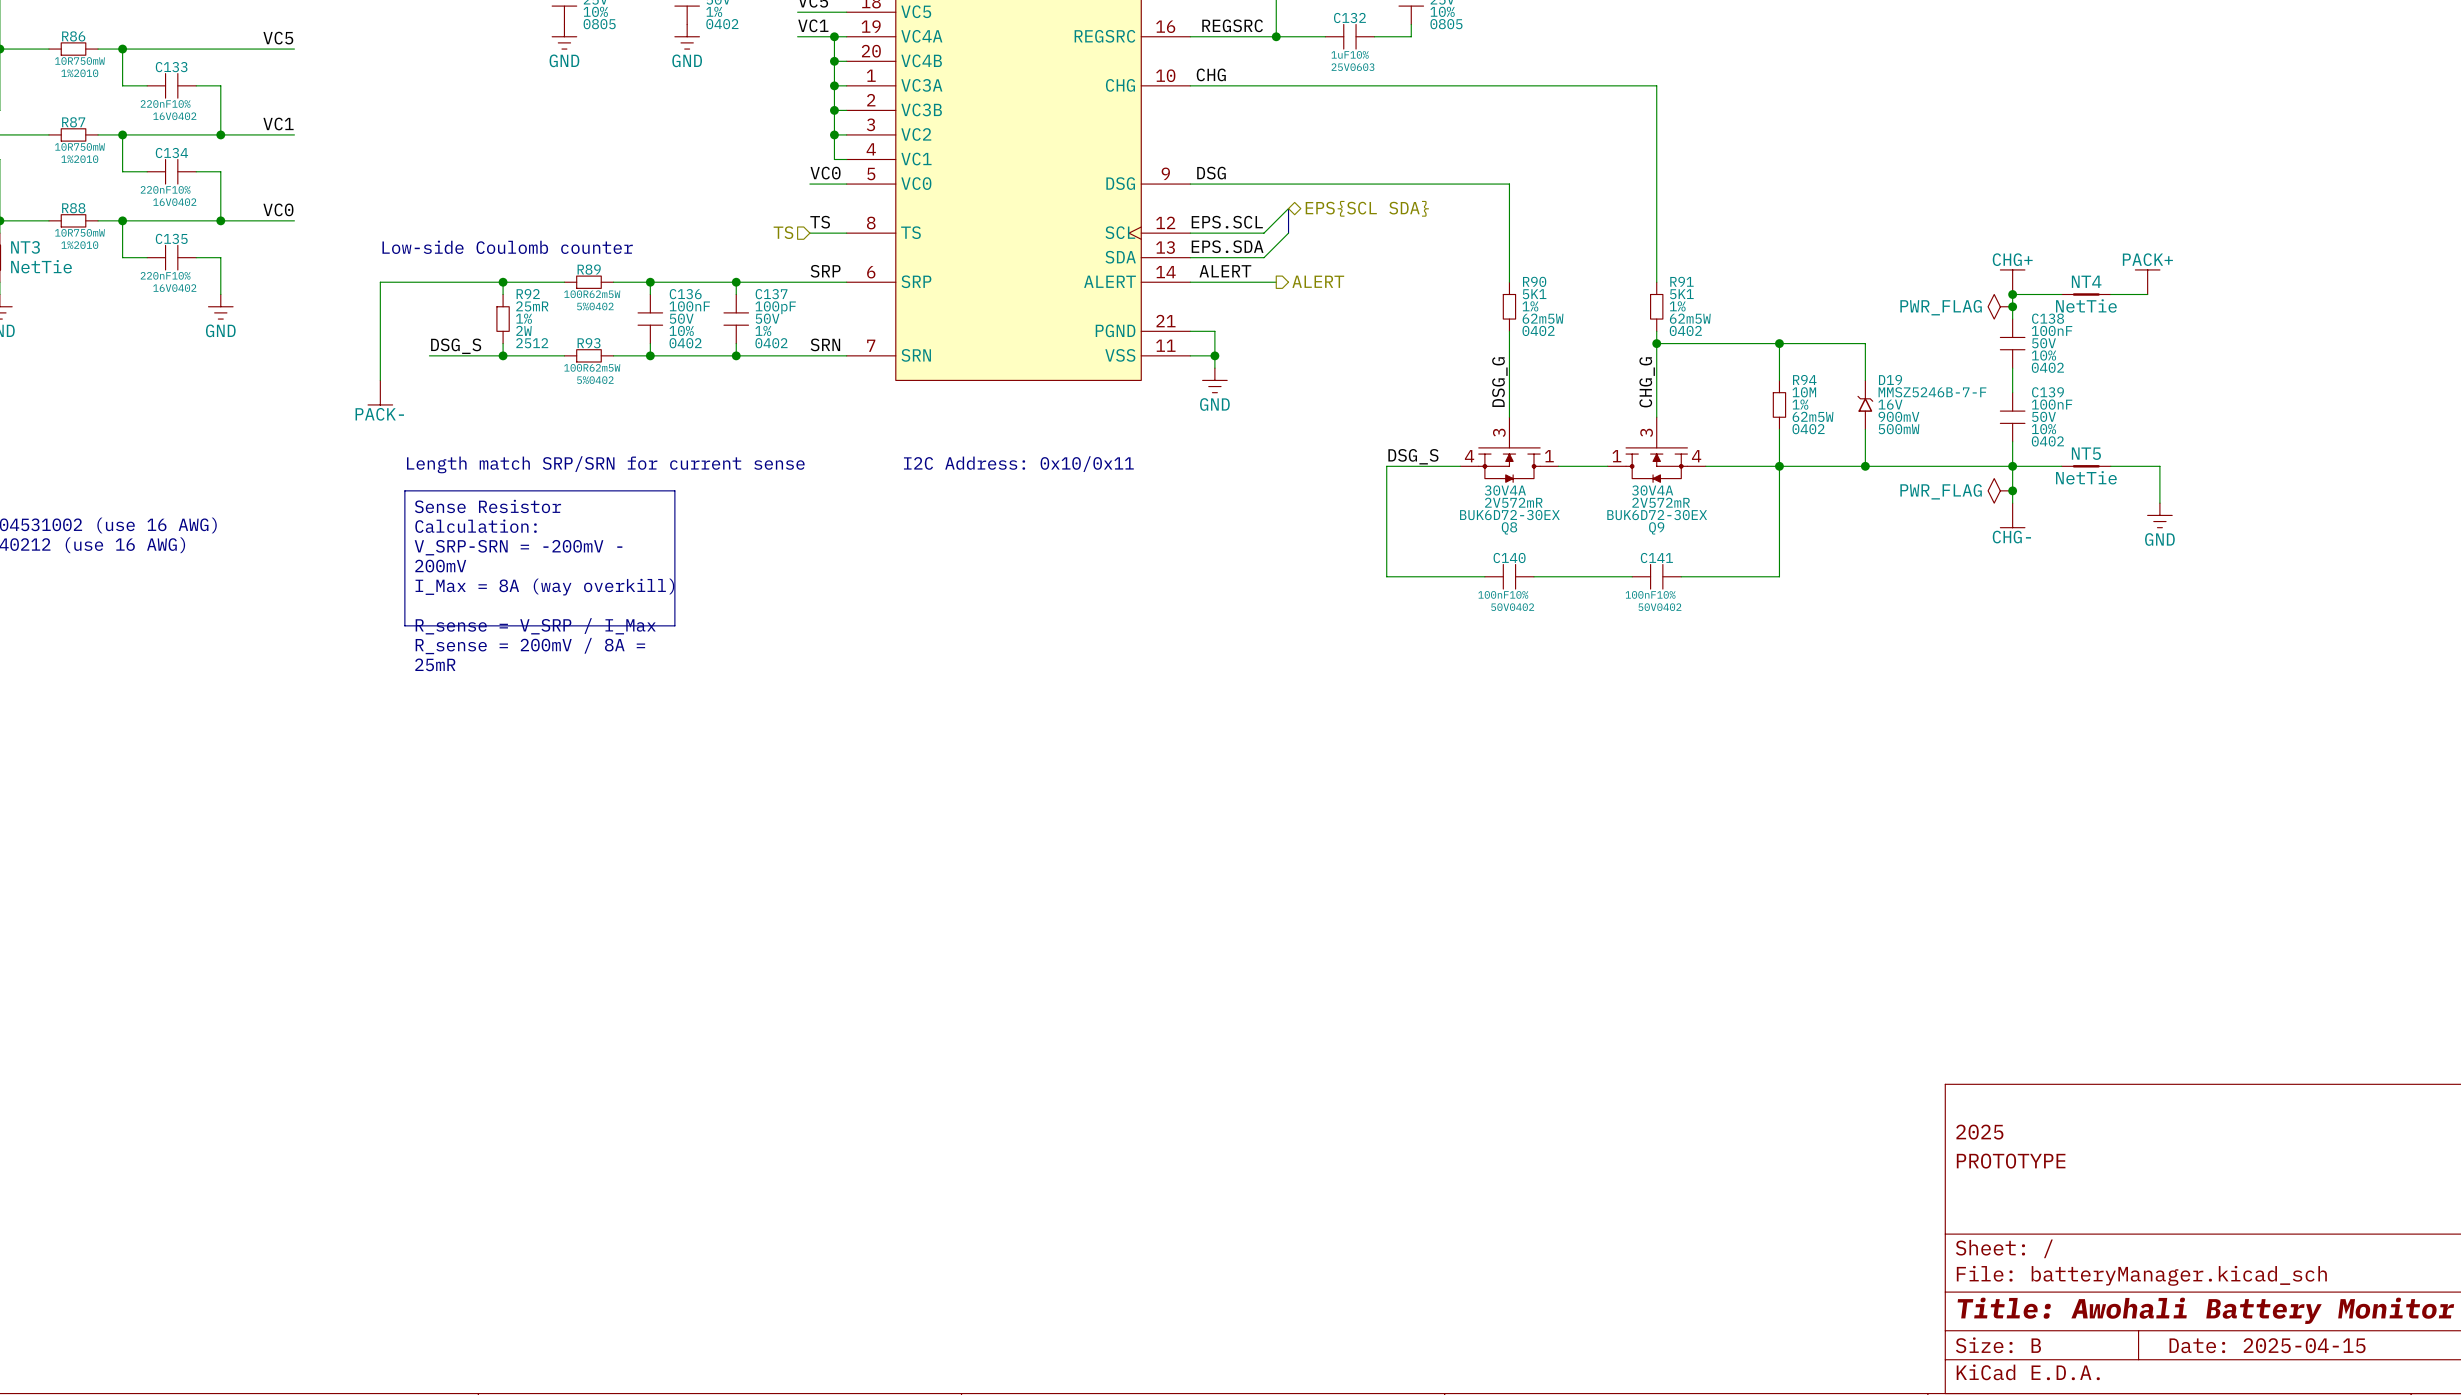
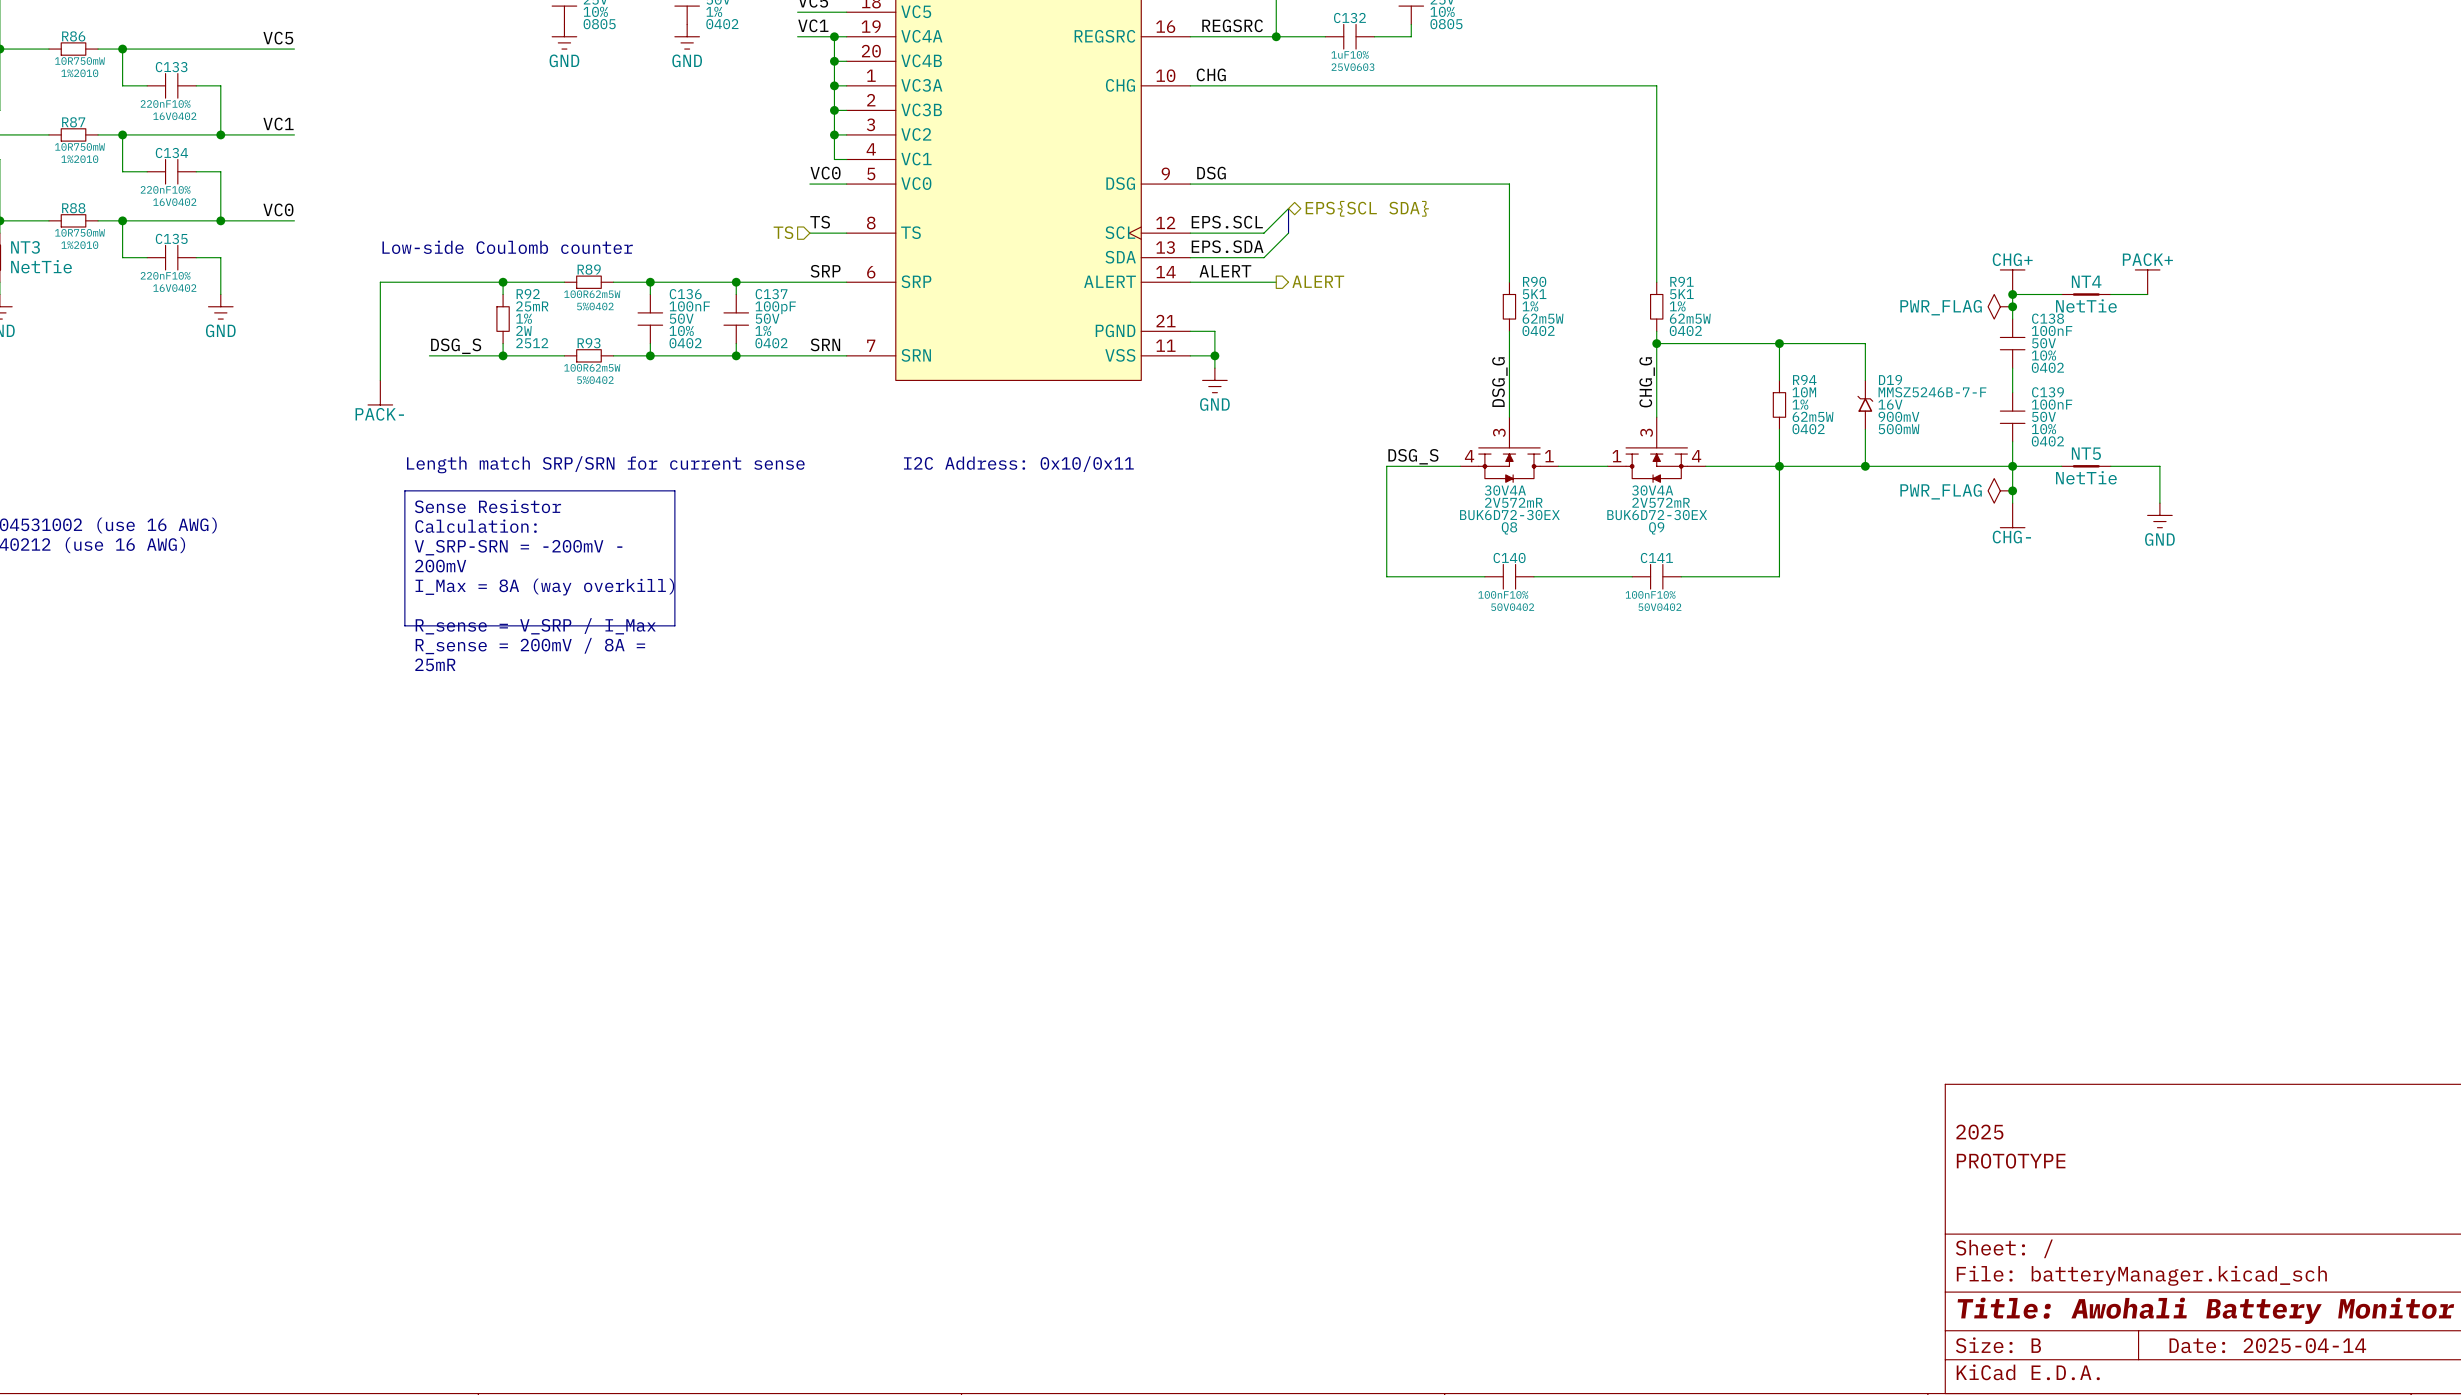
title block: Date: 2025-04-15 (2267, 1345) -> Date: 2025-04-14 (2267, 1345)

